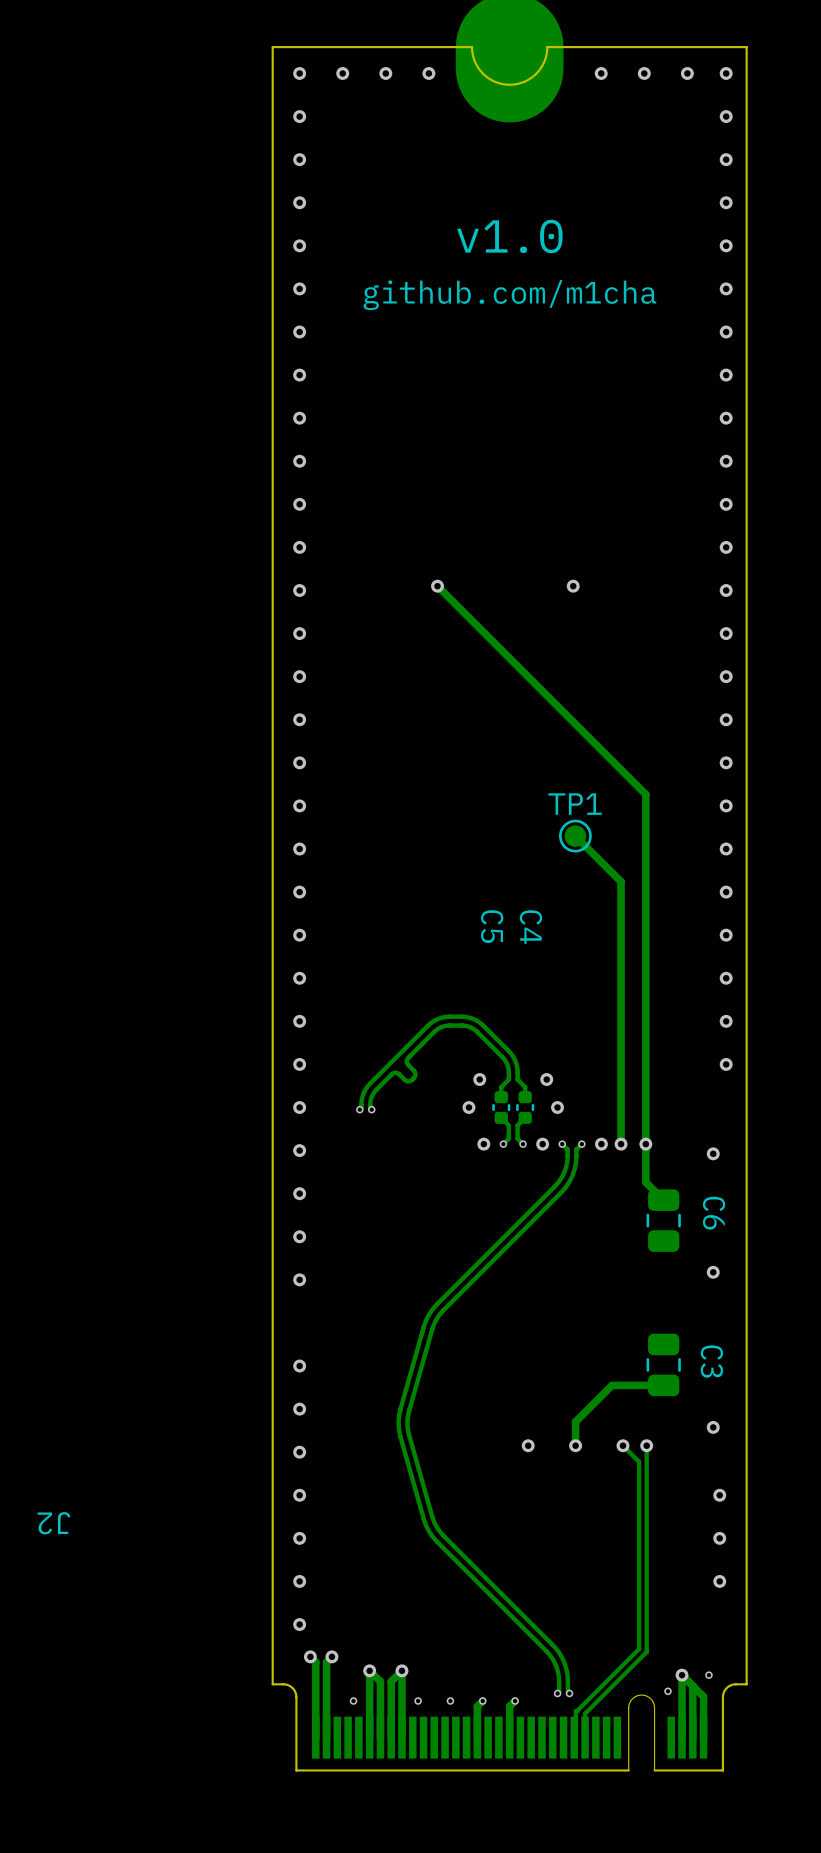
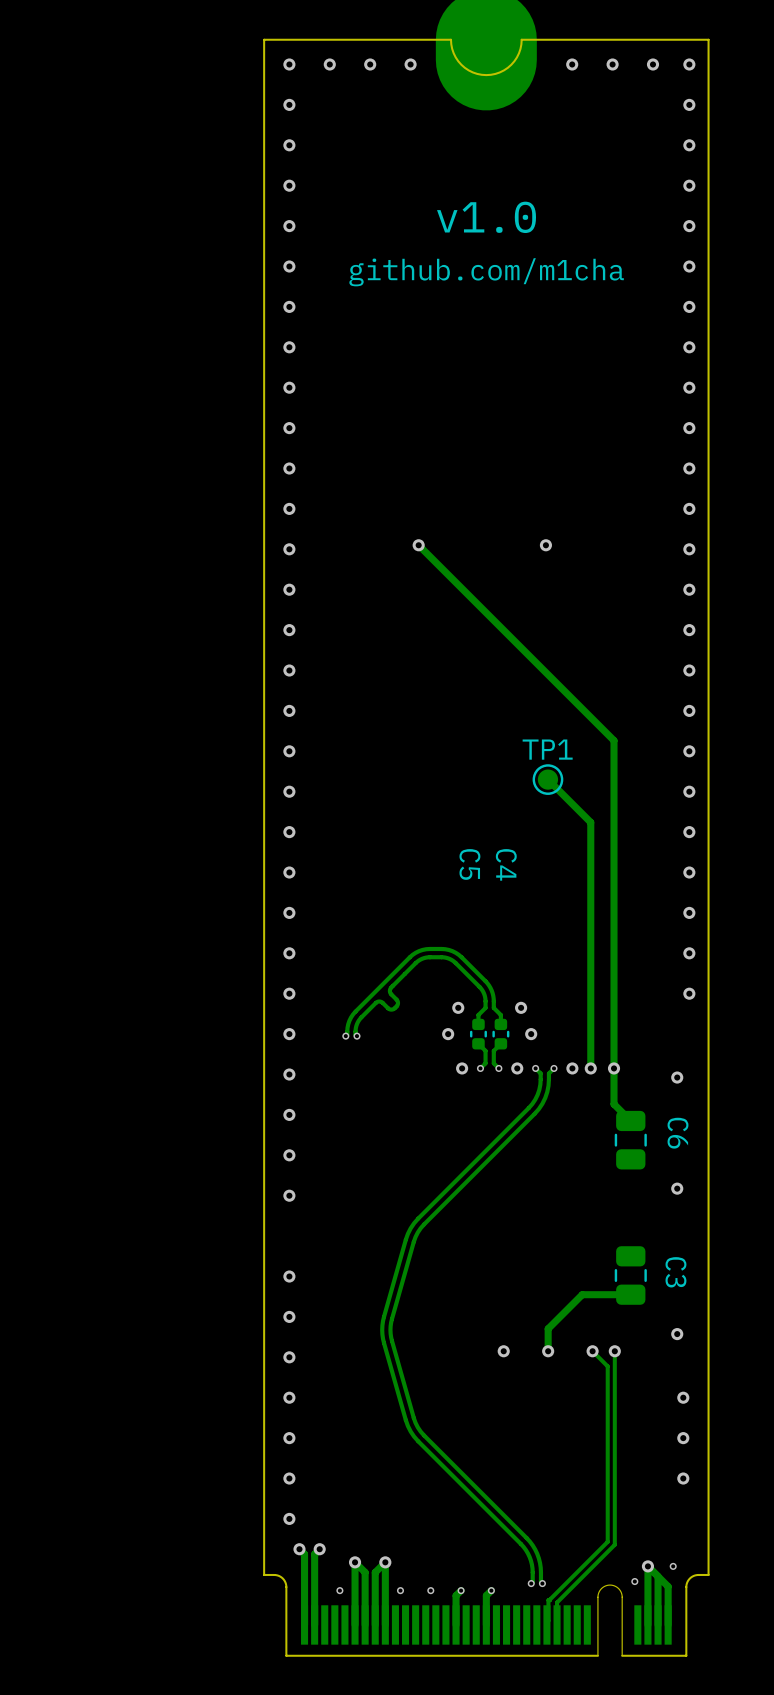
J2: (54, 1523) -> none

